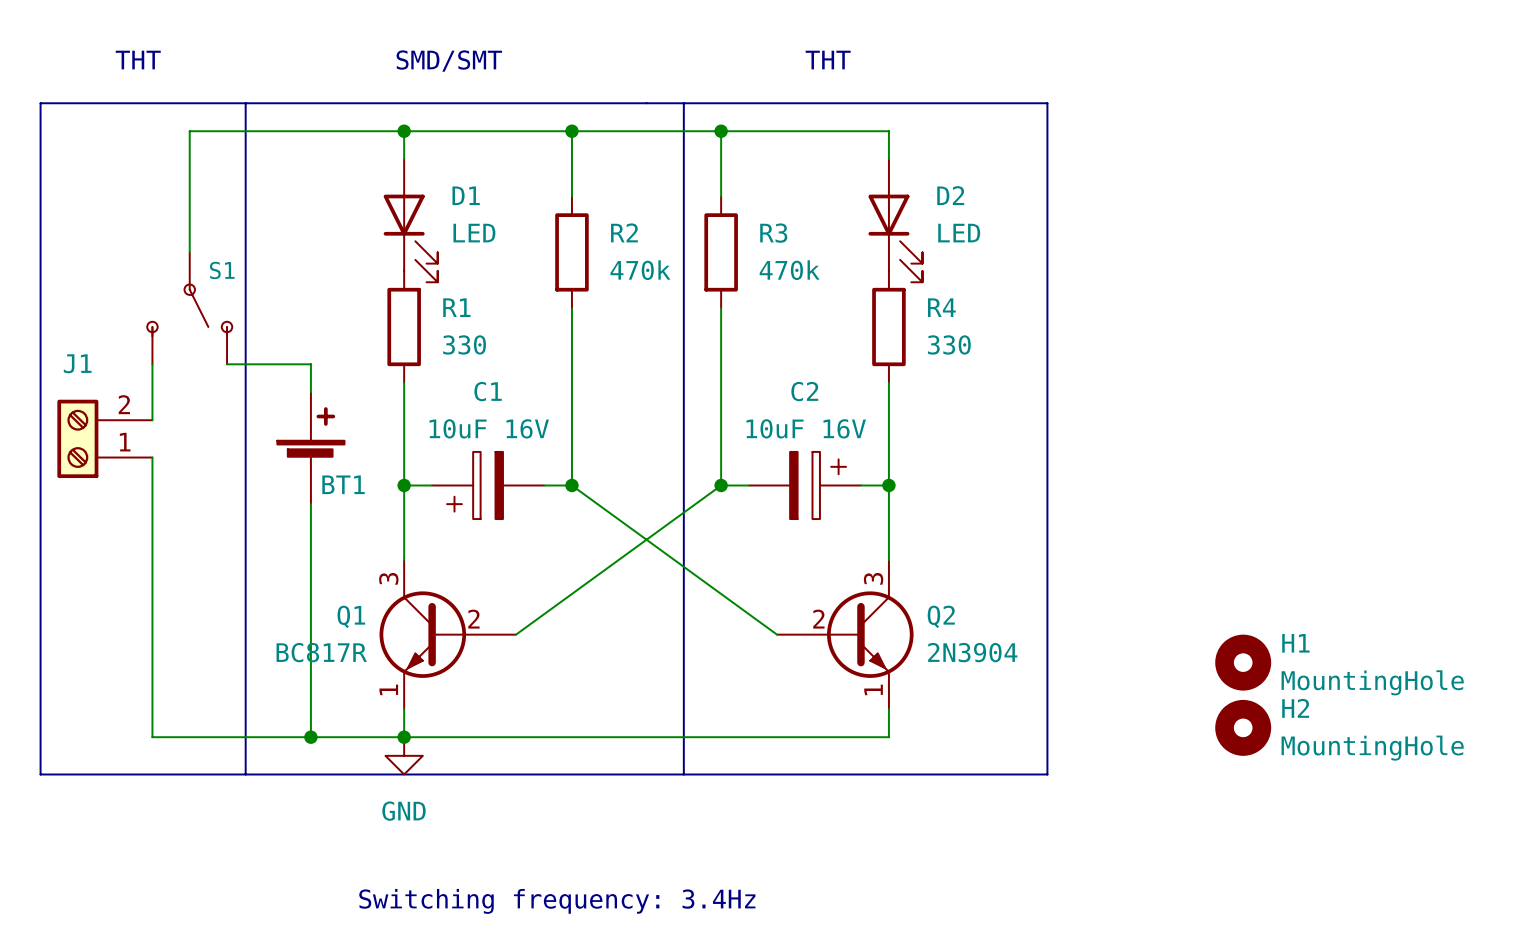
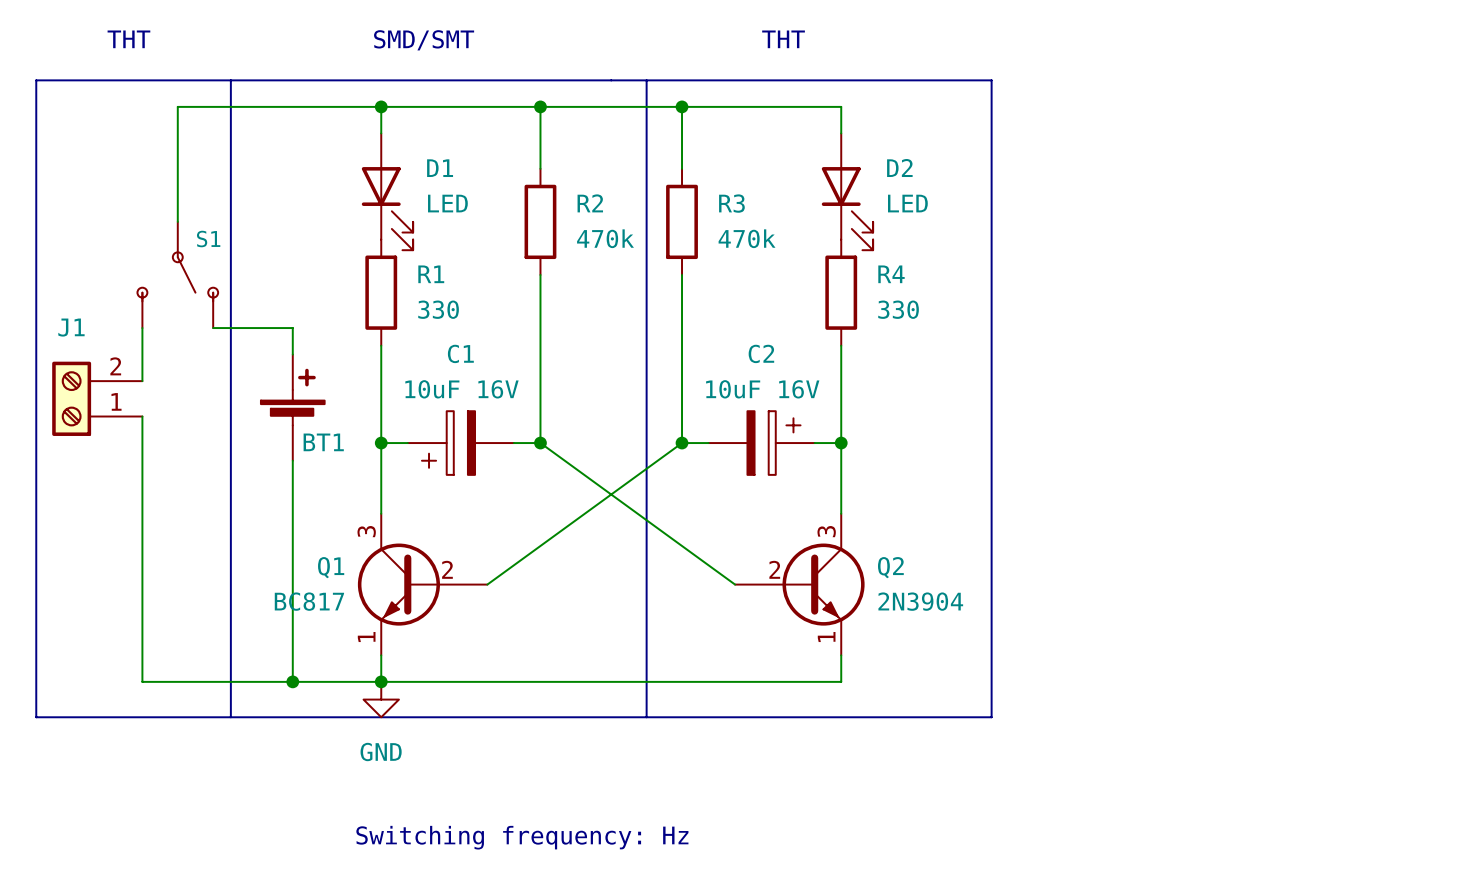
Q1 value: BC817R (321, 652) -> BC817 (309, 601)
H1: MountingHole (1243, 662) -> none
H2: MountingHole (1243, 727) -> none
text: Switching frequency: 3.4Hz (557, 901) -> Switching frequency: Hz (522, 837)

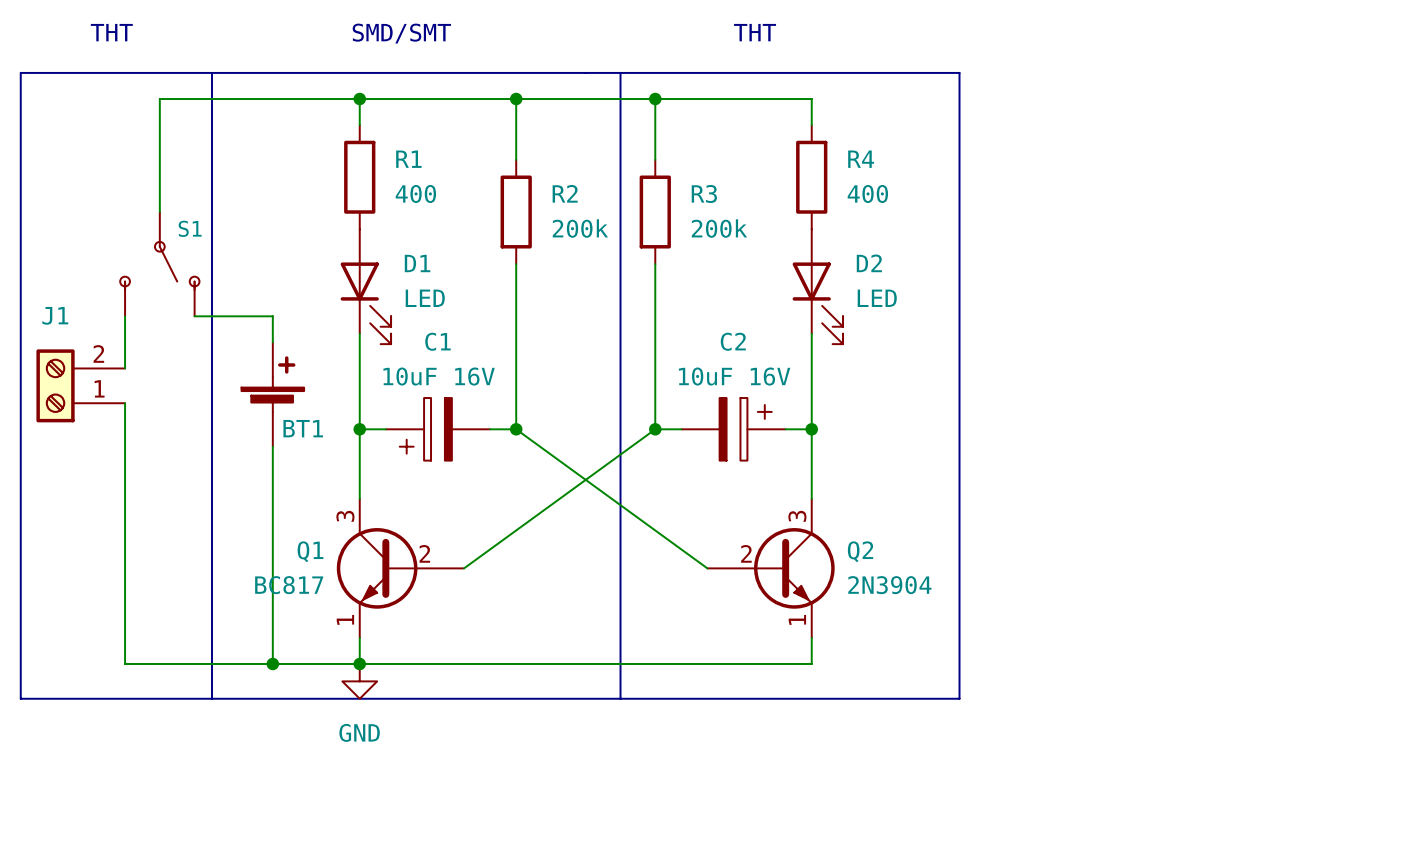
D1 position: (387, 191) -> (365, 286)
D2 position: (847, 191) -> (817, 286)
R2 value: 470k (605, 238) -> 200k (580, 228)
R3 value: 470k (747, 238) -> 200k (719, 228)
R1 position: (381, 292) -> (359, 177)
R4 position: (841, 292) -> (811, 177)
R1 value: 330 (438, 309) -> 400 (415, 193)
R4 value: 330 (898, 309) -> 400 (867, 193)
text: Switching frequency: Hz (522, 837) -> none

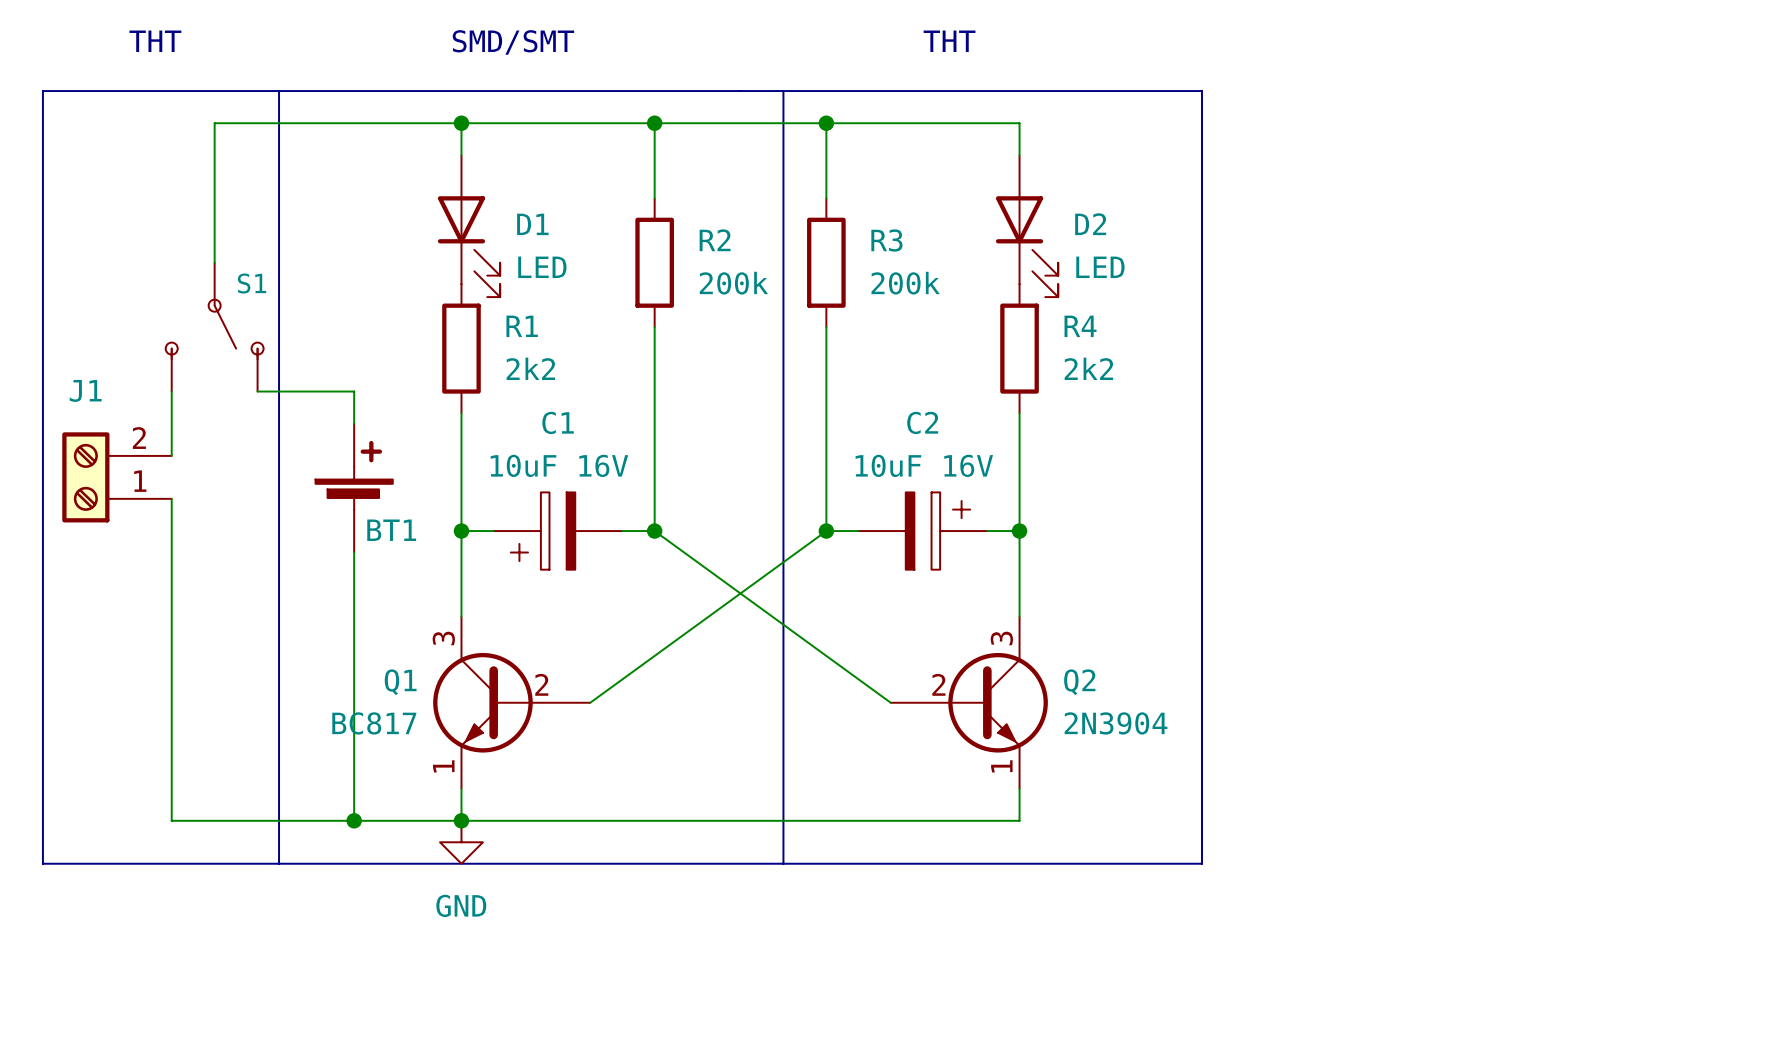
R1 position: (359, 177) -> (461, 348)
R4 position: (811, 177) -> (1019, 348)
R1 value: 400 (415, 193) -> 2k2 (530, 368)
R4 value: 400 (867, 193) -> 2k2 (1088, 368)
D1 name position: D1 (417, 263) -> D1 (532, 224)
D2 name position: D2 (869, 263) -> D2 (1090, 224)
D1 position: (365, 286) -> (468, 226)
D2 position: (817, 286) -> (1027, 226)
D1 value position: LED (425, 298) -> LED (542, 267)
D2 value position: LED (877, 298) -> LED (1100, 267)

